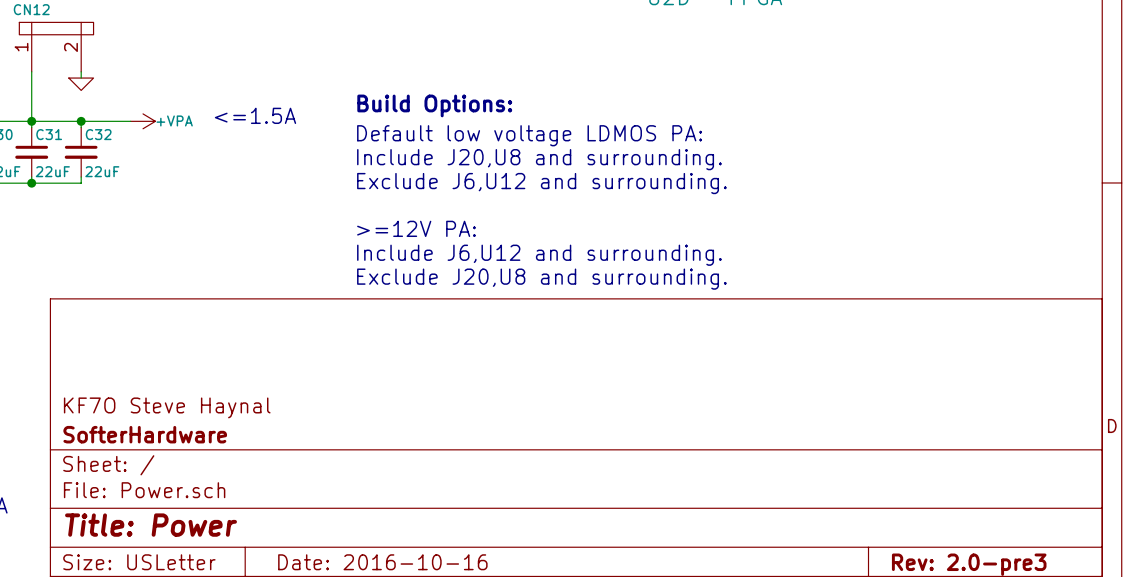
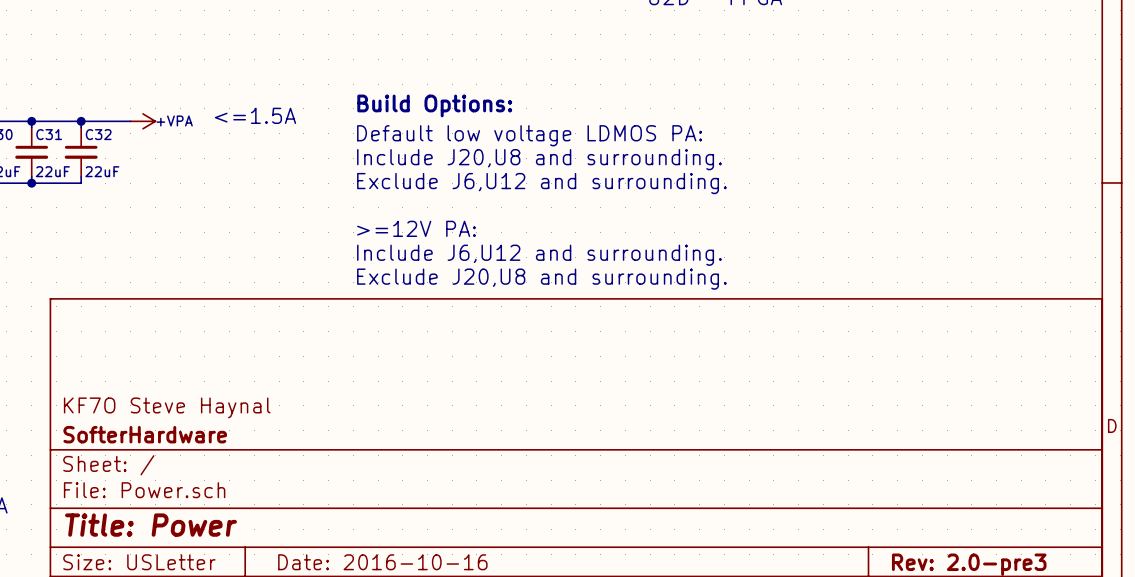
CN12: (56, 47) -> none
wire: (31, 71) (31, 121) -> none
wire: (81, 71) (81, 78) -> none
power symbol: (81, 84) -> none

